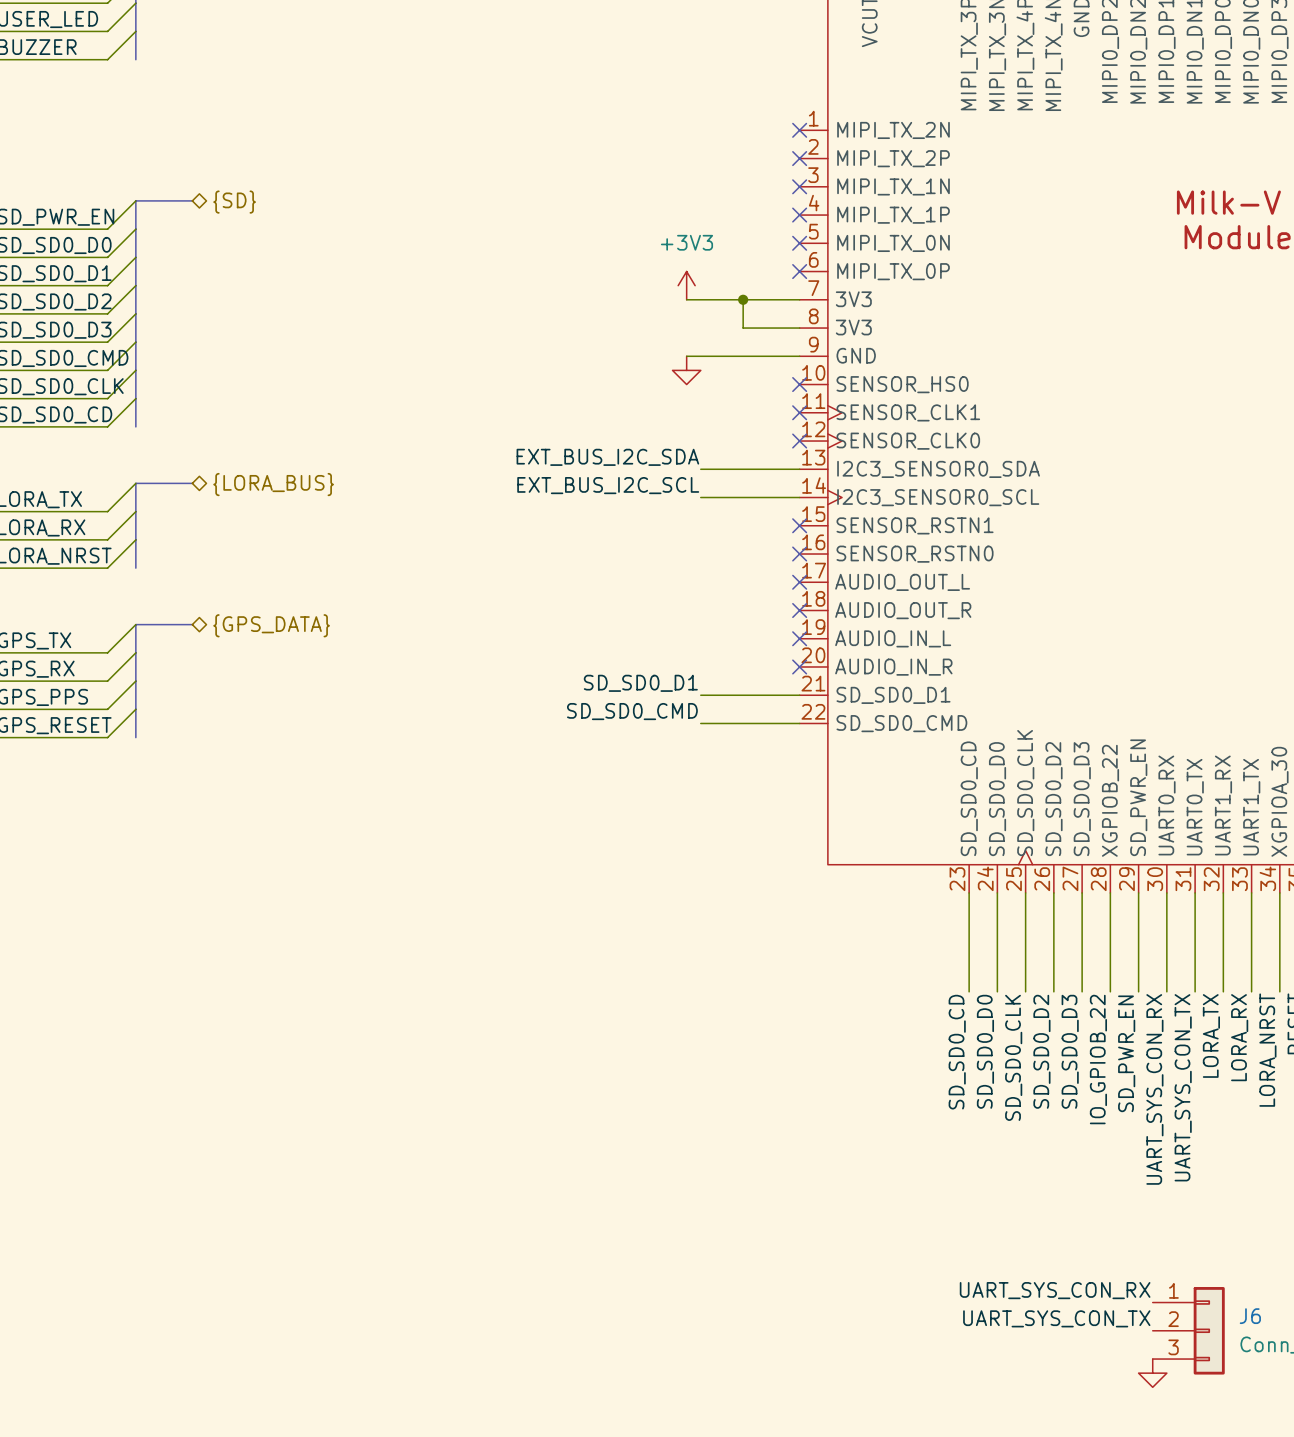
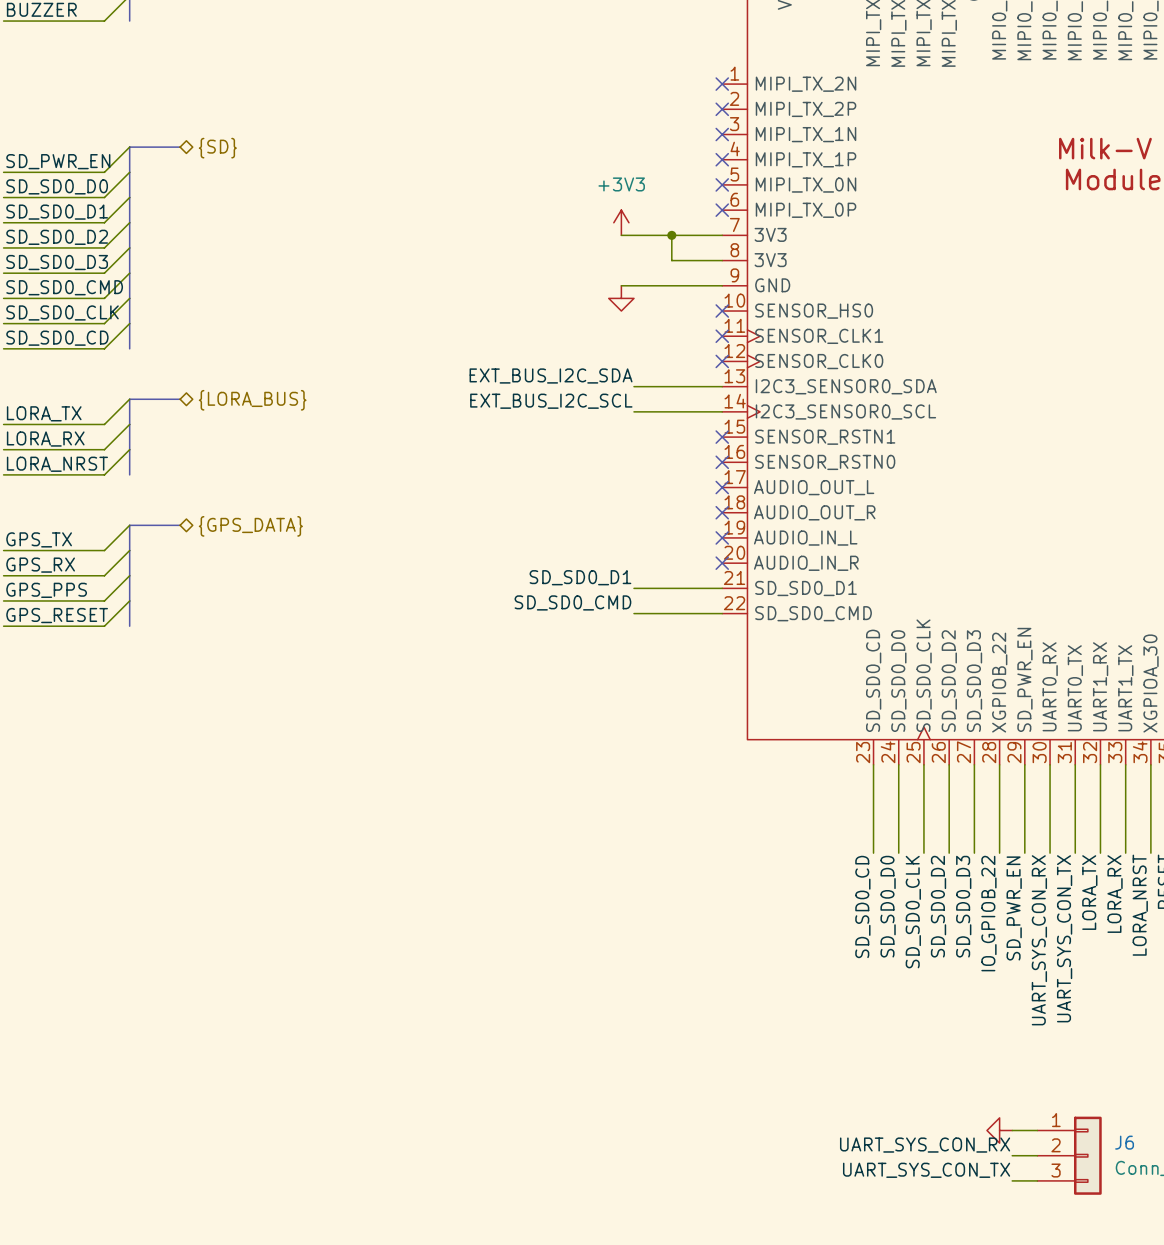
label position: UART_SYS_CON_RX (1055, 1290) -> UART_SYS_CON_RX (925, 1145)
wire: none -> (1012, 1130) (1037, 1130)
label position: UART_SYS_CON_TX (1056, 1318) -> UART_SYS_CON_TX (926, 1170)
wire: none -> (1012, 1155) (1037, 1155)
wire: none -> (1012, 1180) (1037, 1180)
power symbol rotation: 0° (1152, 1373) -> 90° clockwise (999, 1130)
power symbol position: (1152, 1373) -> (999, 1130)

